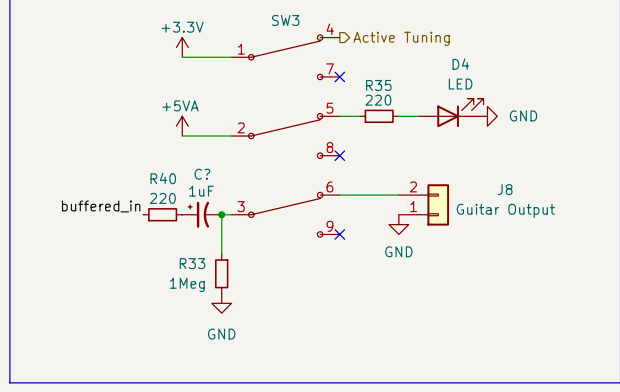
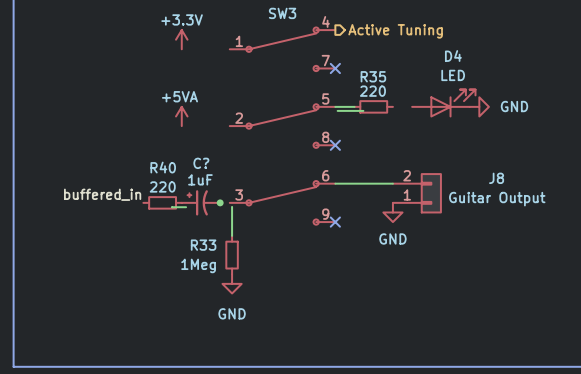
wire: (182, 57) (231, 57) -> none
wire: (398, 116) (418, 116) -> none
wire: none -> (337, 110) (363, 110)
wire: (182, 136) (231, 136) -> none
wire: (231, 214) (221, 214) (221, 254) -> none
wire: none -> (232, 206) (232, 235)
wire: none -> (172, 207) (186, 207)
R33 position: (221, 273) -> (232, 255)
power symbol position: GND (221, 303) -> GND (232, 283)

